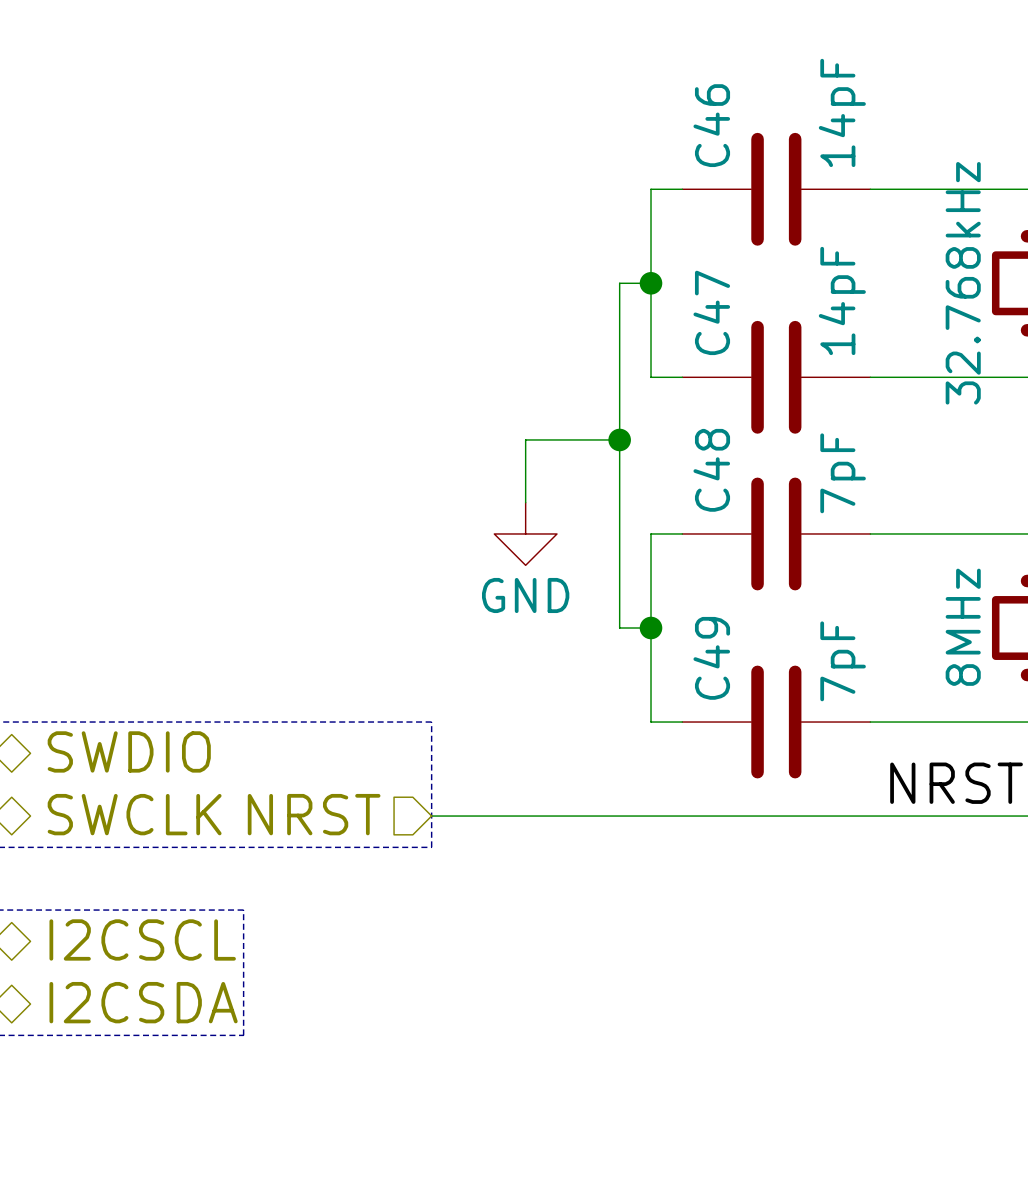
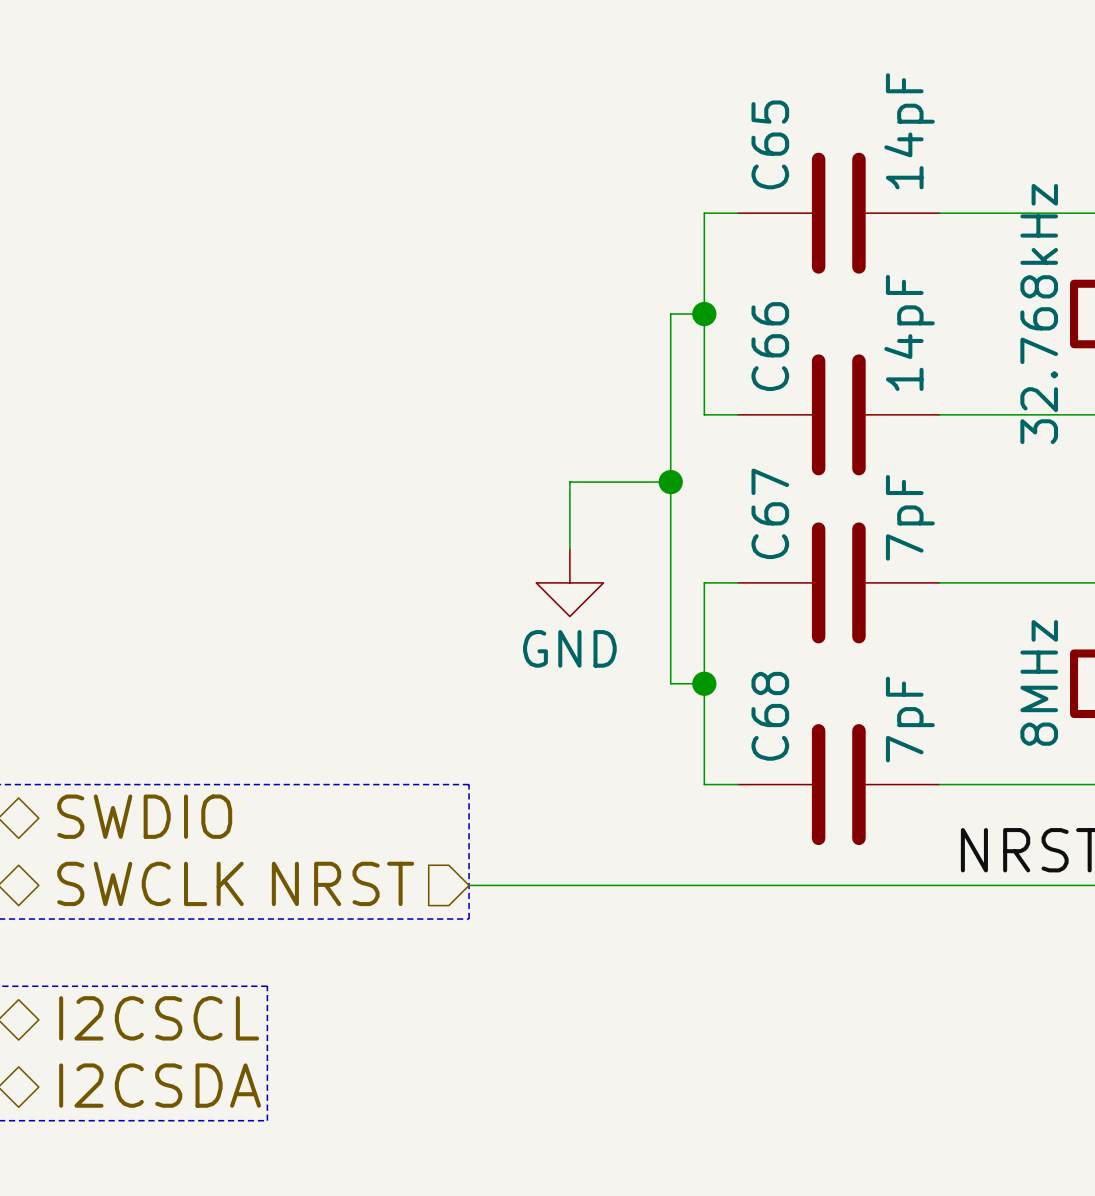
C46 name: C46 (711, 125) -> C65 (770, 144)
C47 name: C47 (711, 312) -> C66 (770, 346)
C48 name: C48 (711, 470) -> C67 (770, 513)
C49 name: C49 (711, 658) -> C68 (770, 716)

